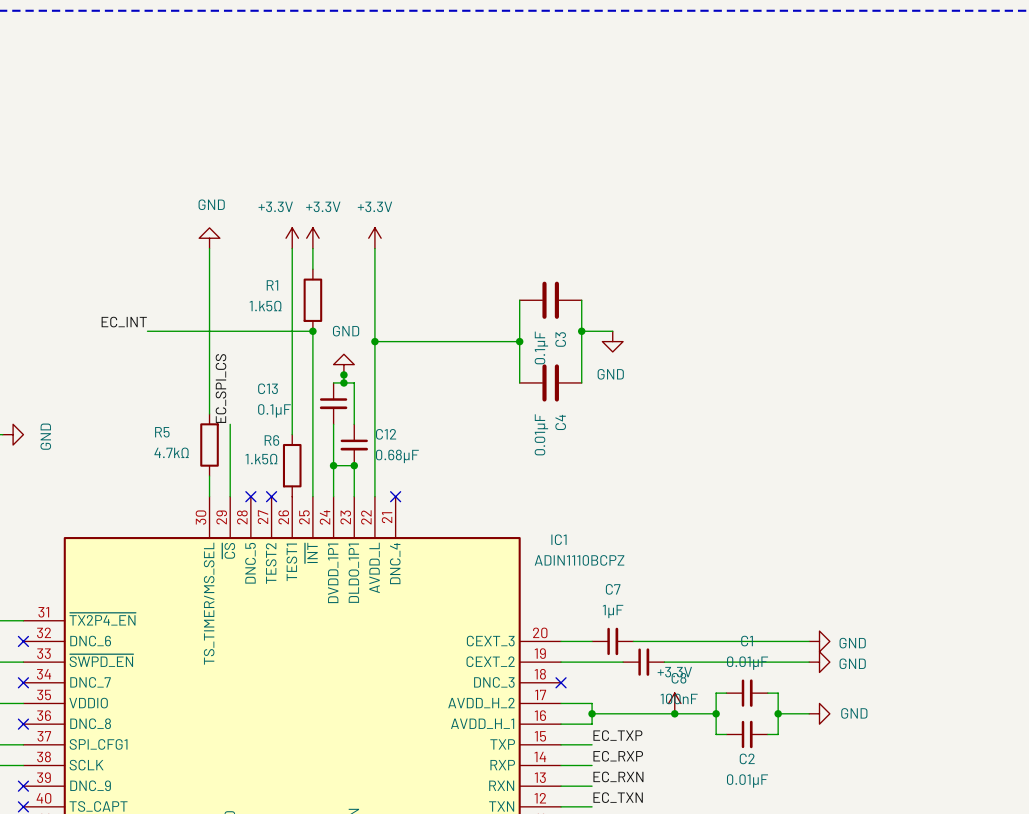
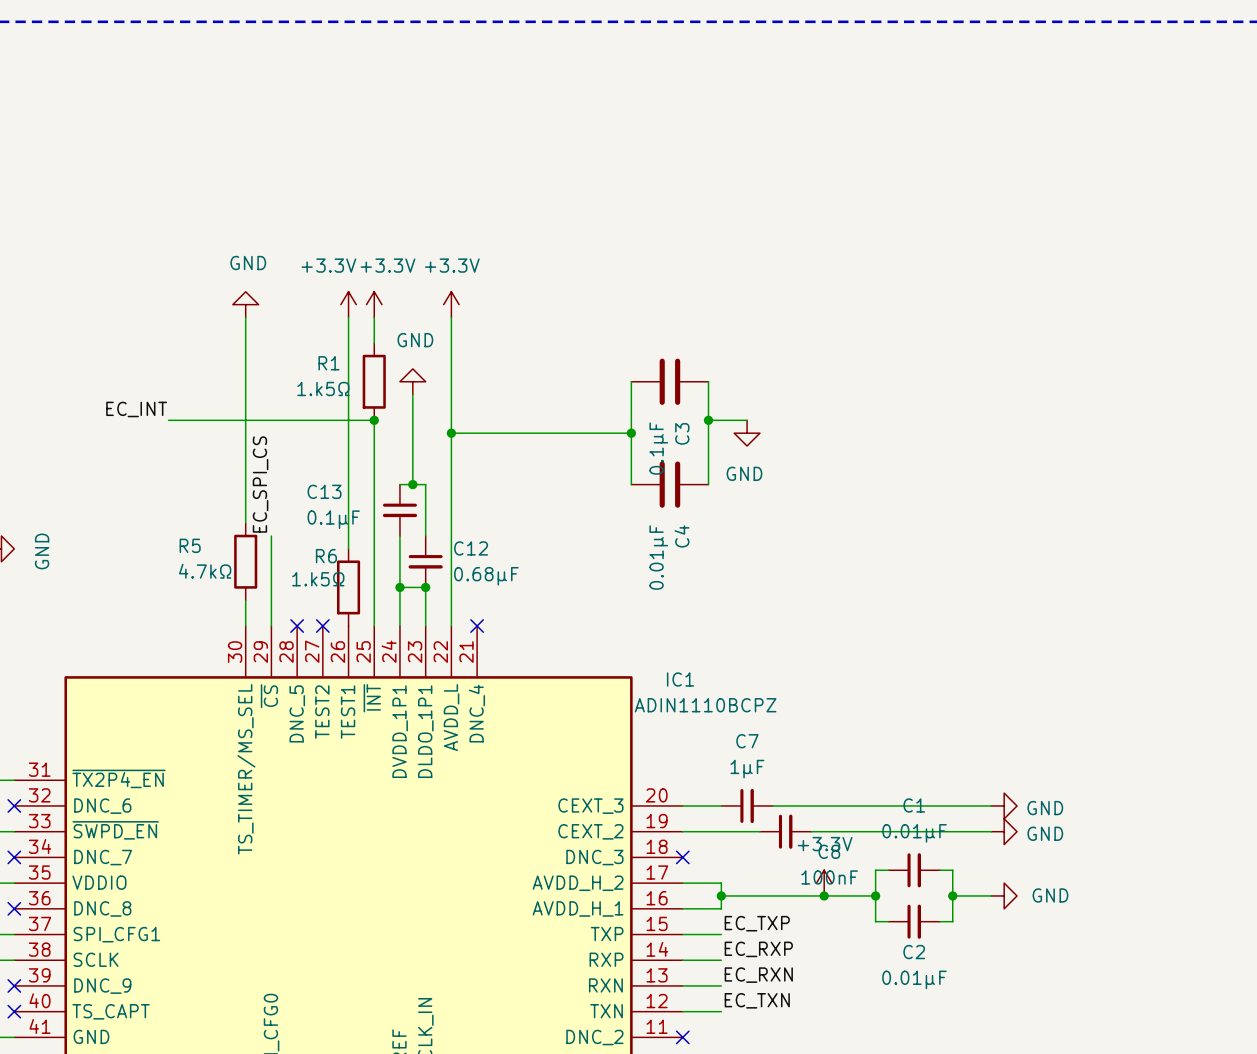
wire: none -> (412, 394) (412, 471)
power symbol position: GND (343, 364) -> GND (412, 381)
junction: (343, 374) -> none

